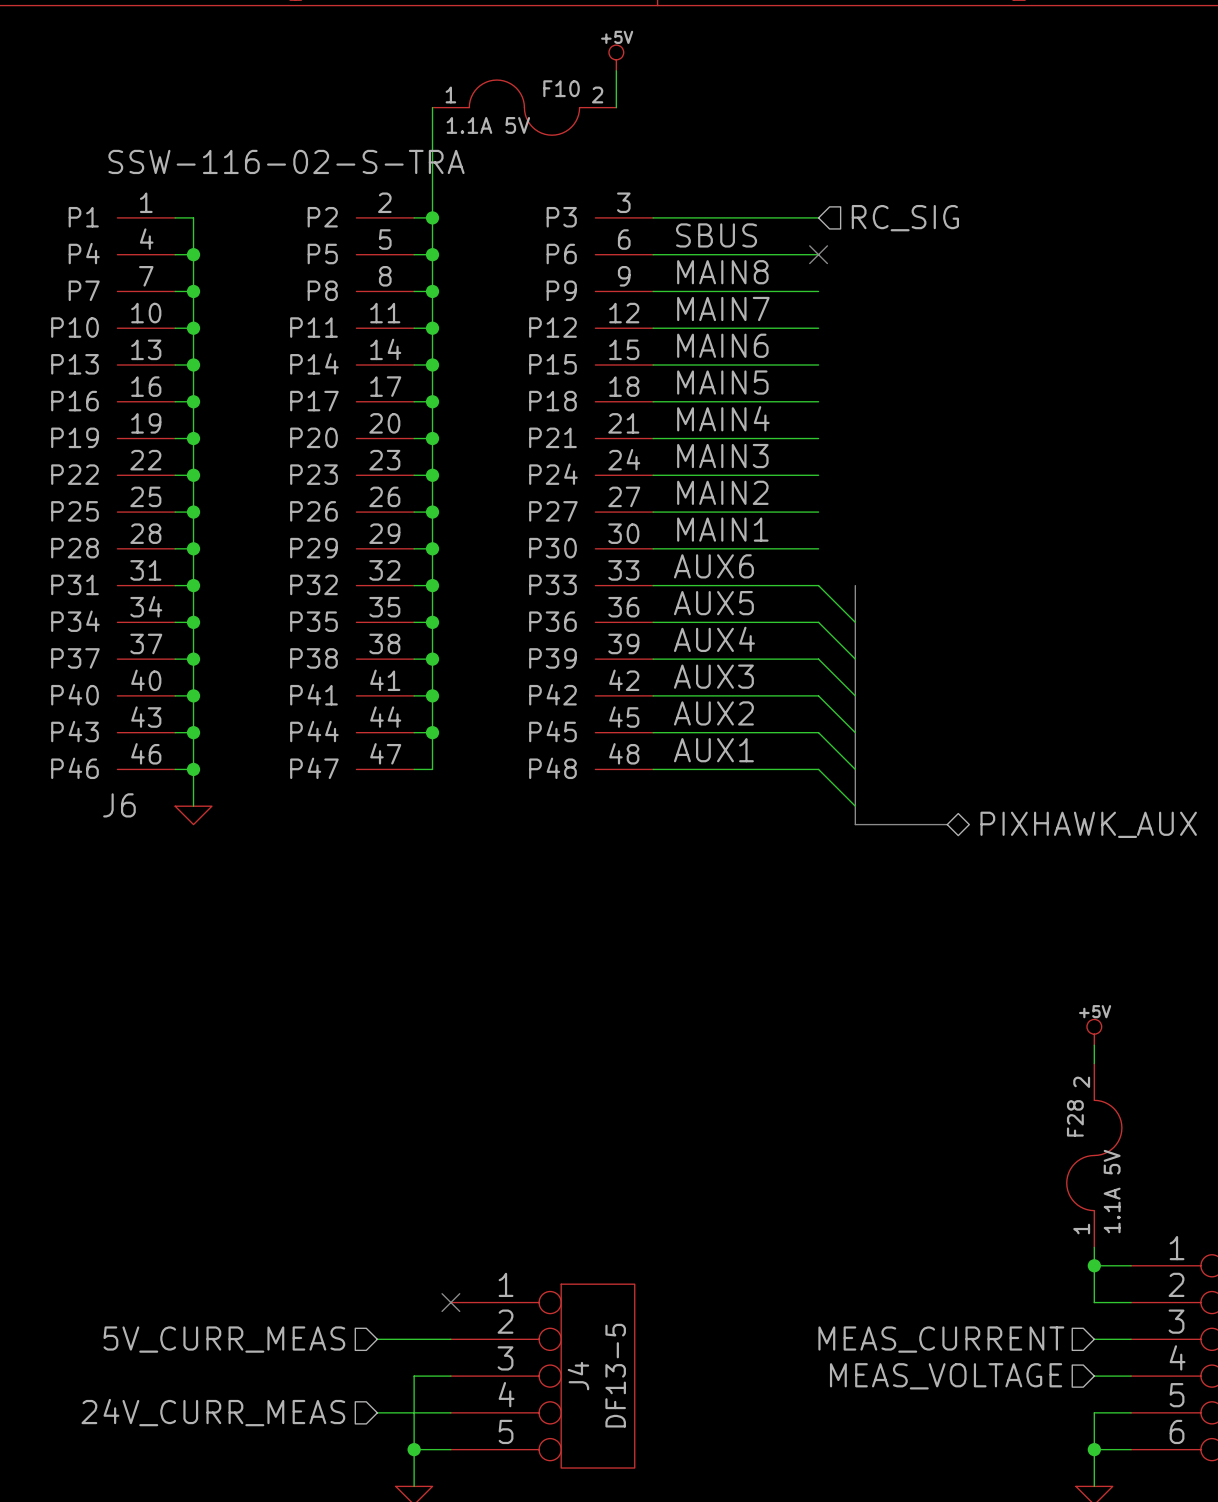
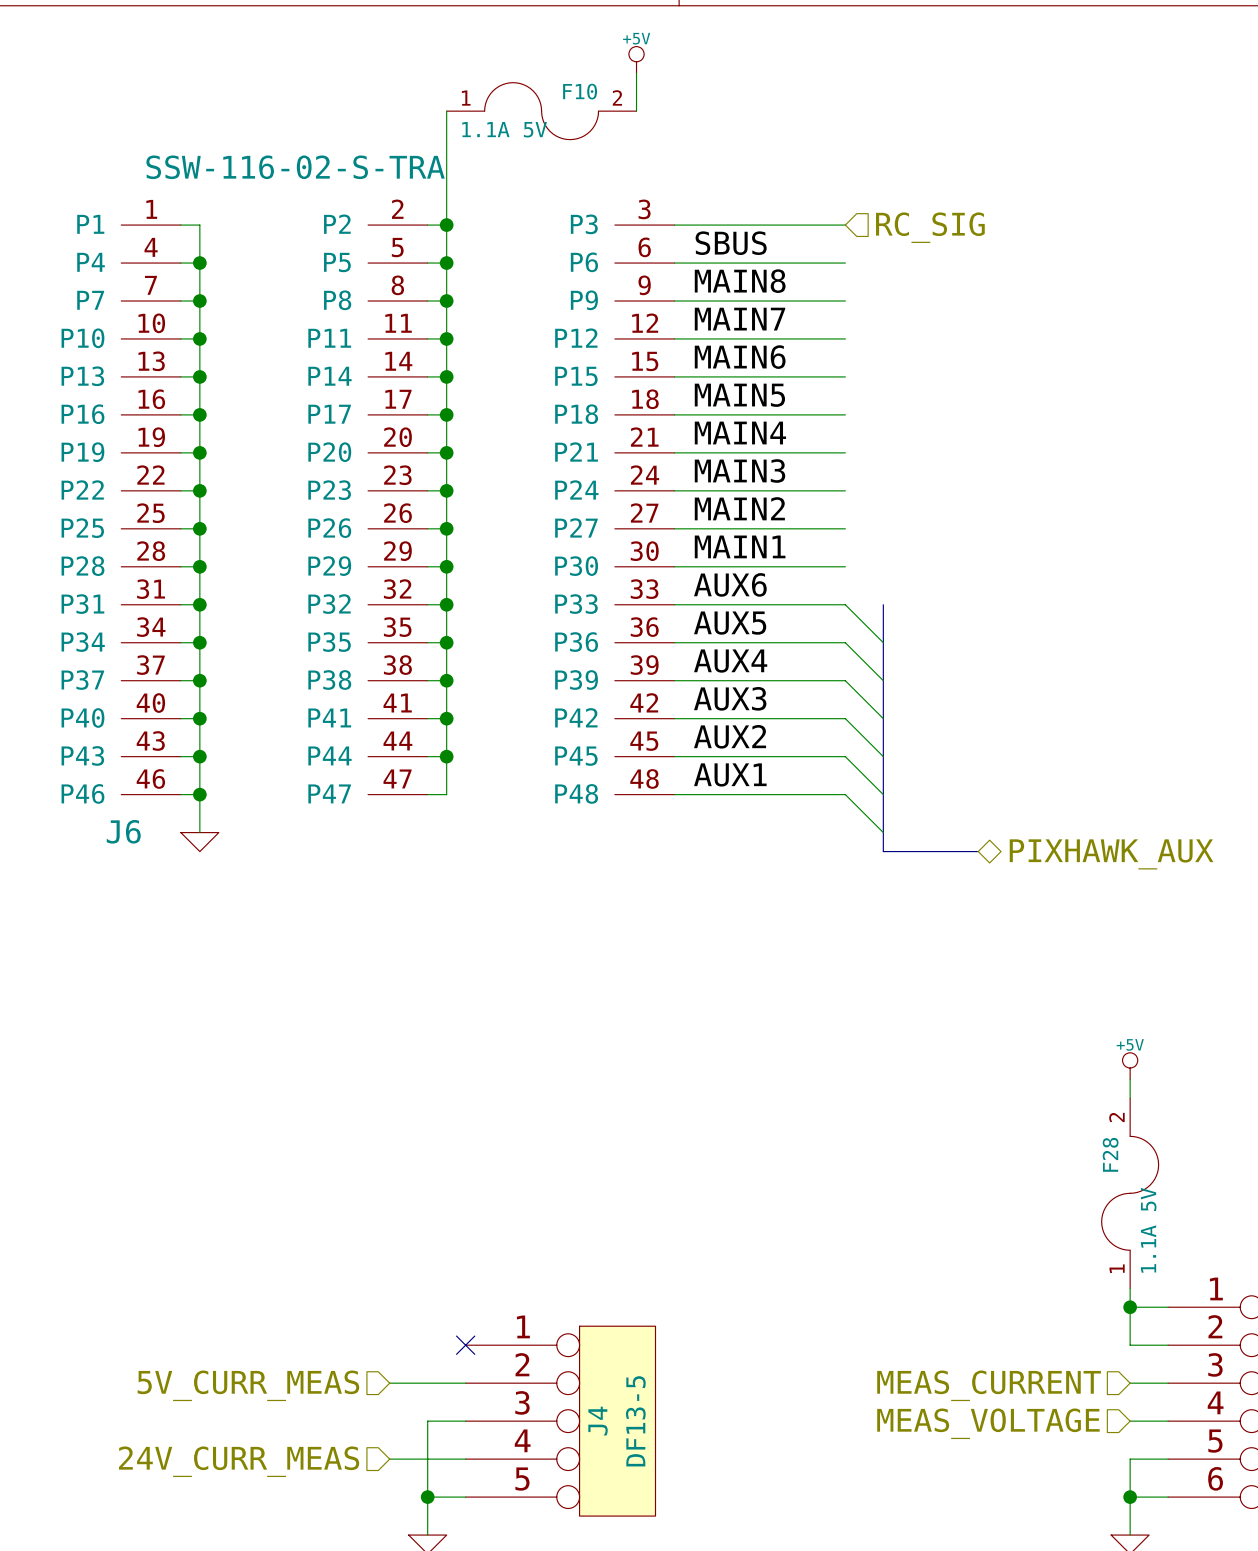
no-connect mark: (818, 254) -> none

